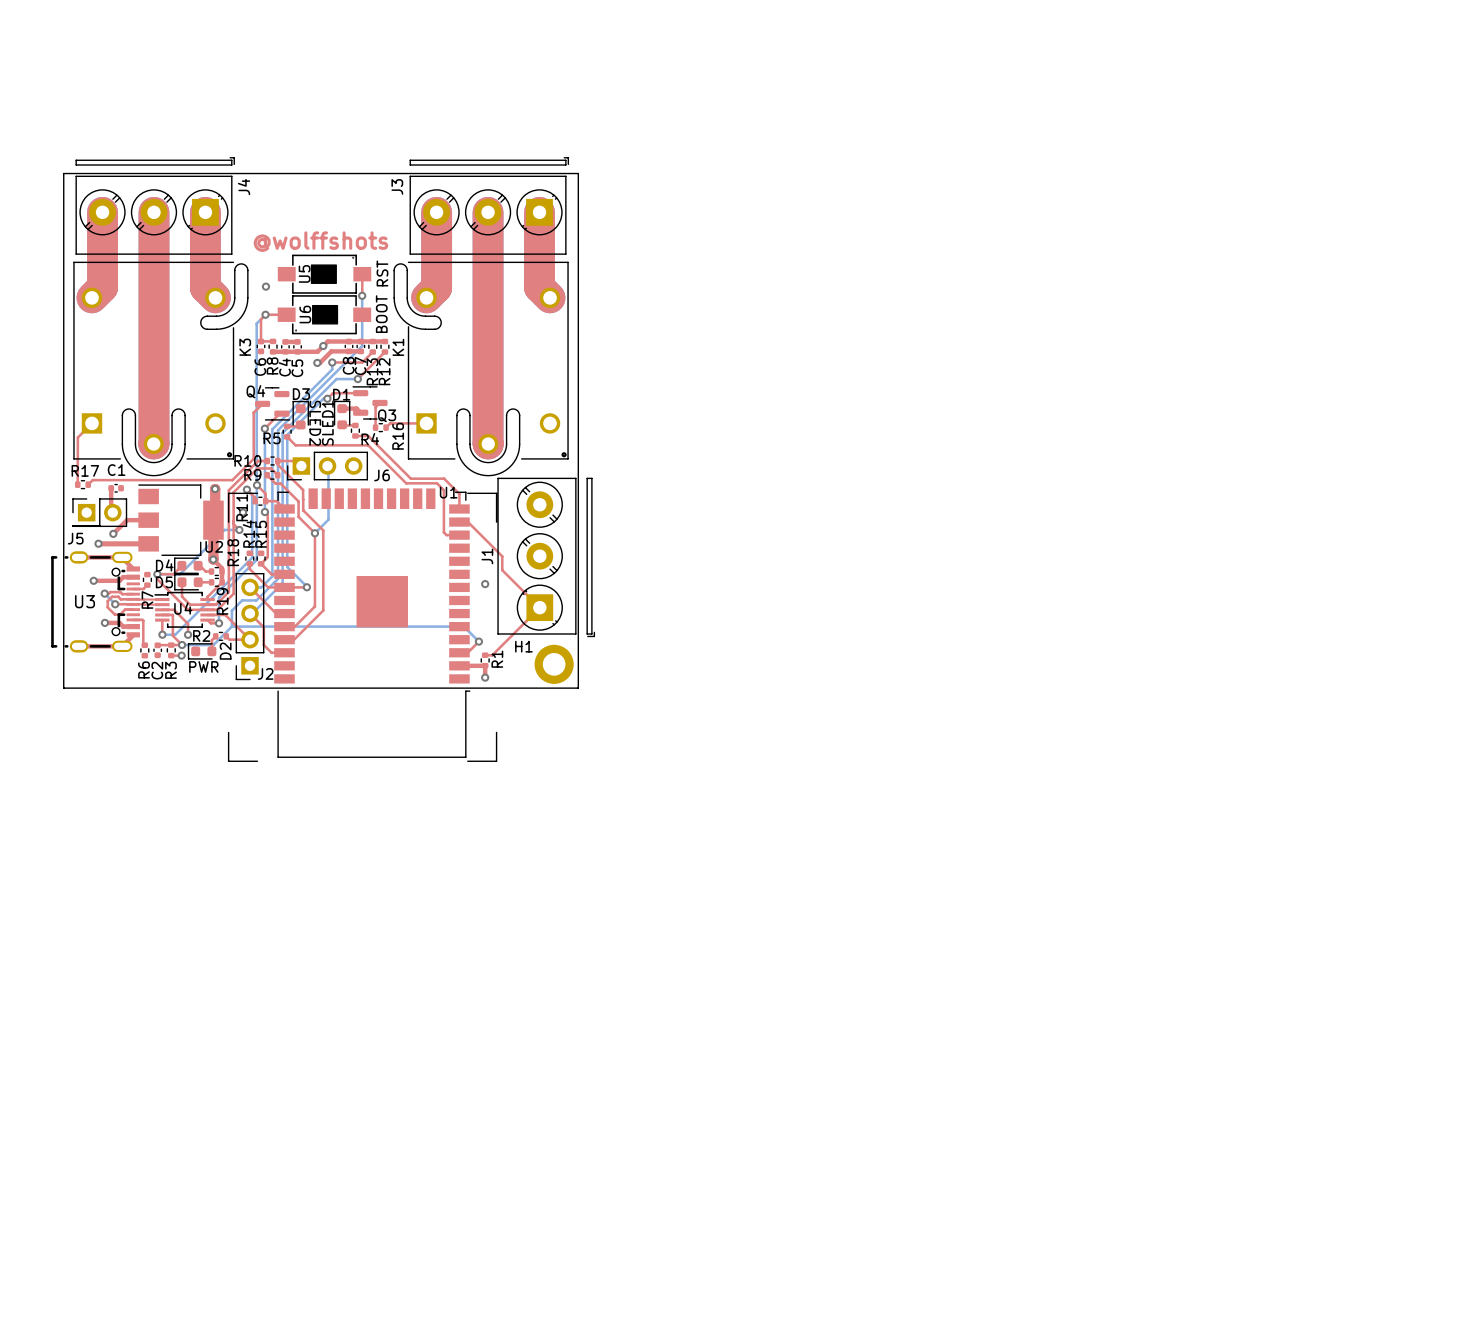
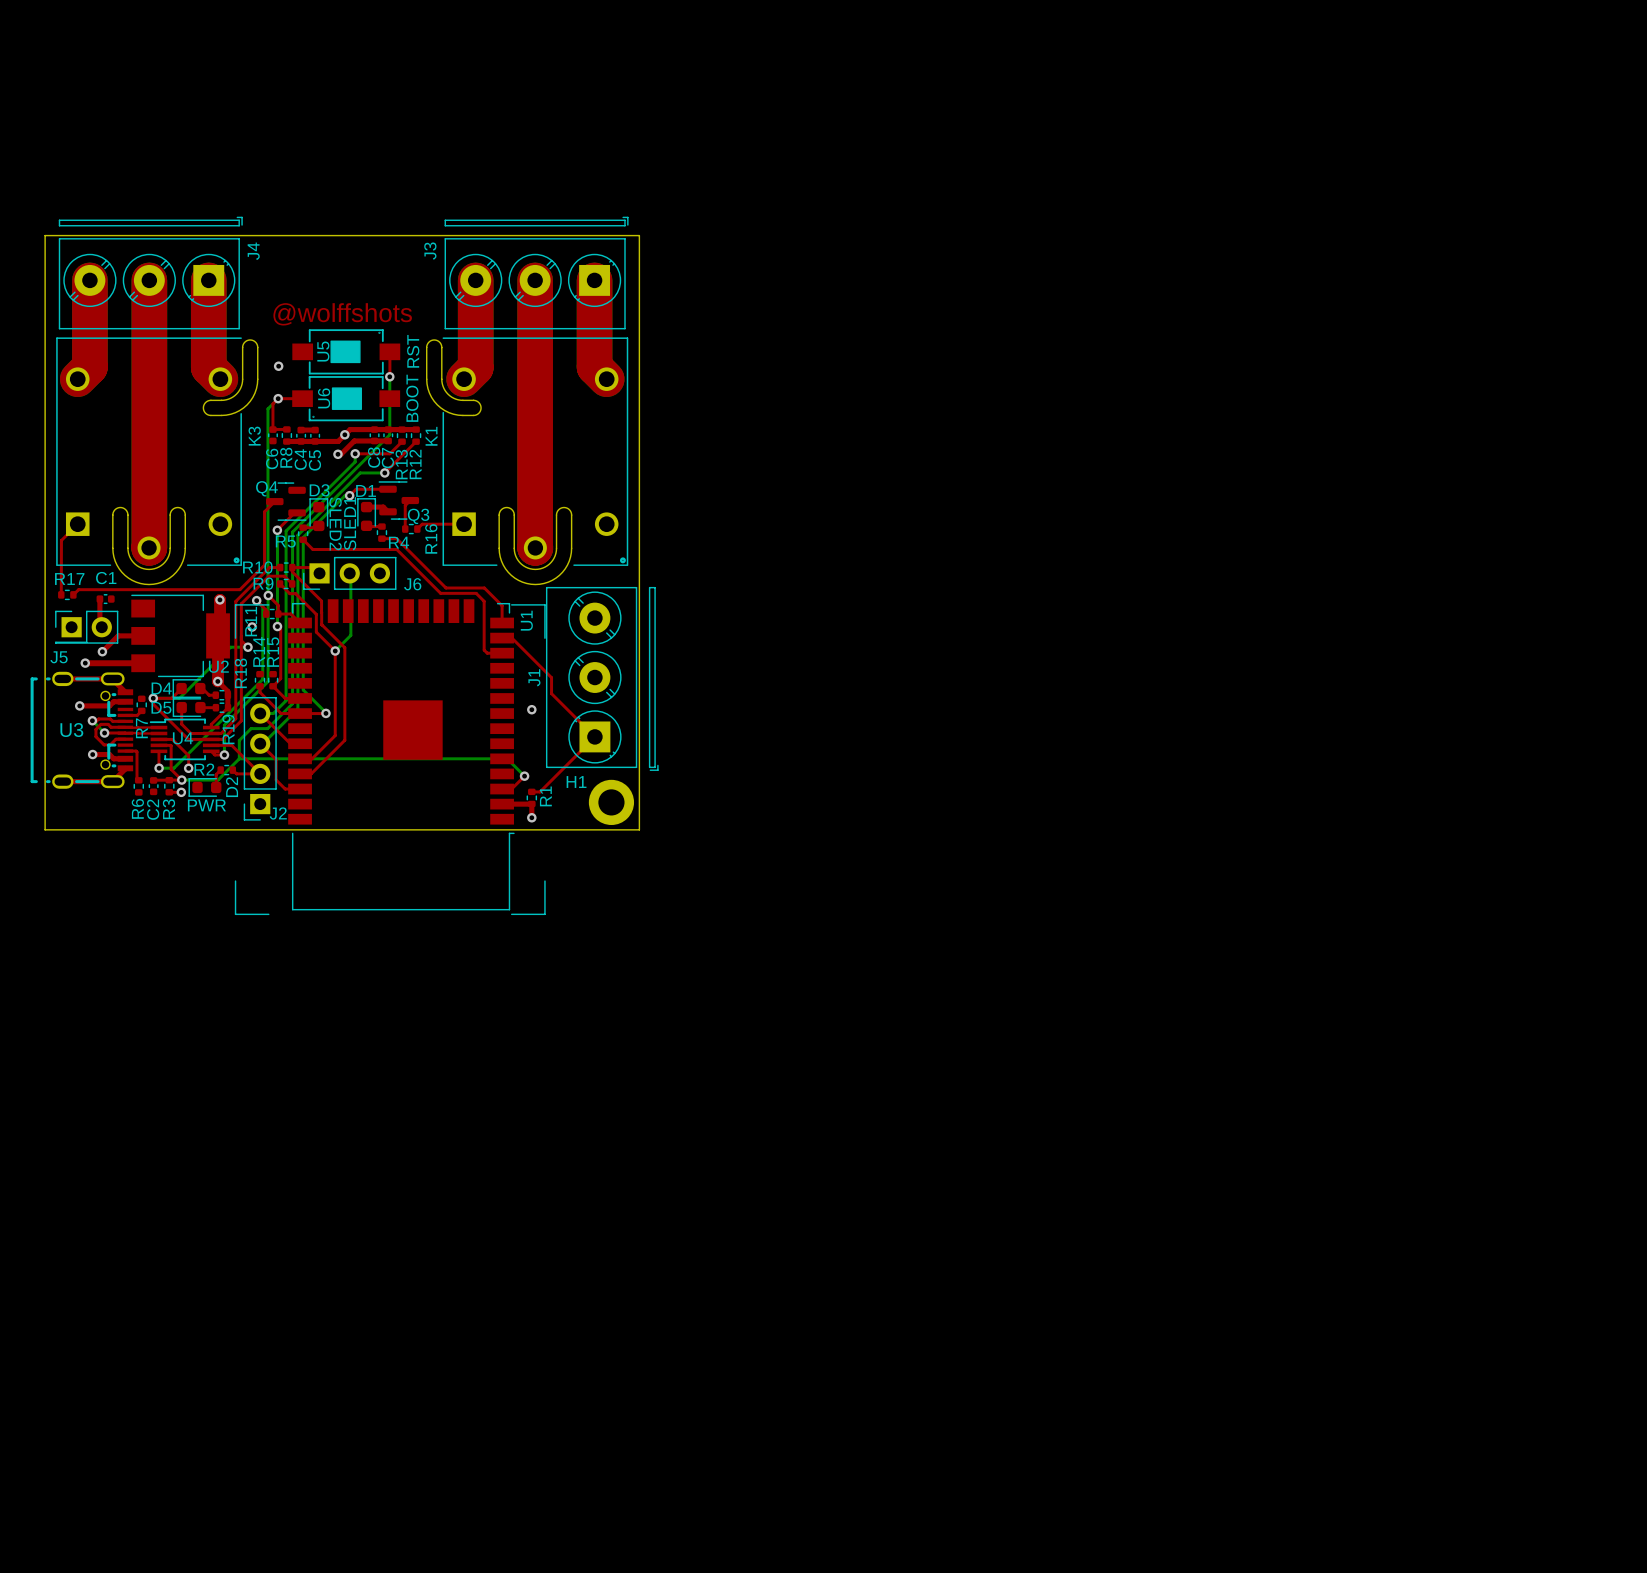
U1 name rotation: 0° (448, 492) -> 90° counterclockwise (526, 620)
U1 name position: U1 (448, 492) -> U1 (526, 620)

